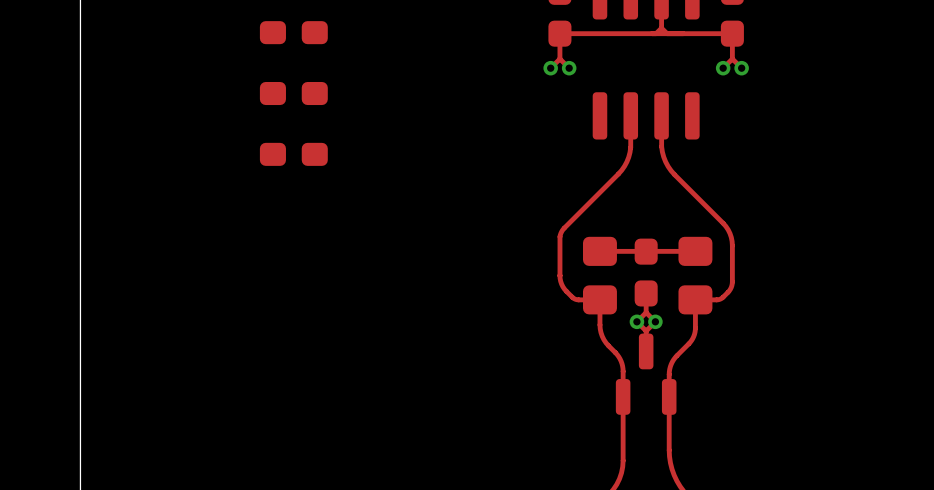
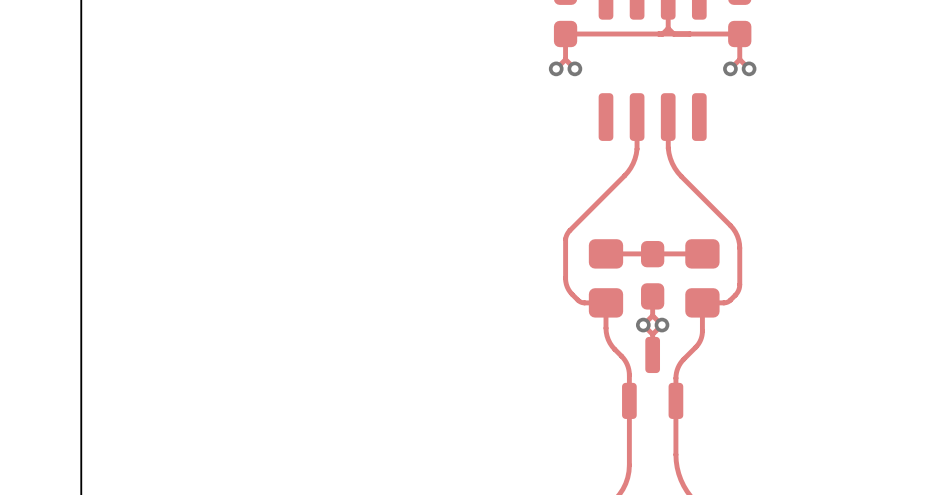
part: (293, 32) -> none
part: (293, 93) -> none
part: (293, 154) -> none

